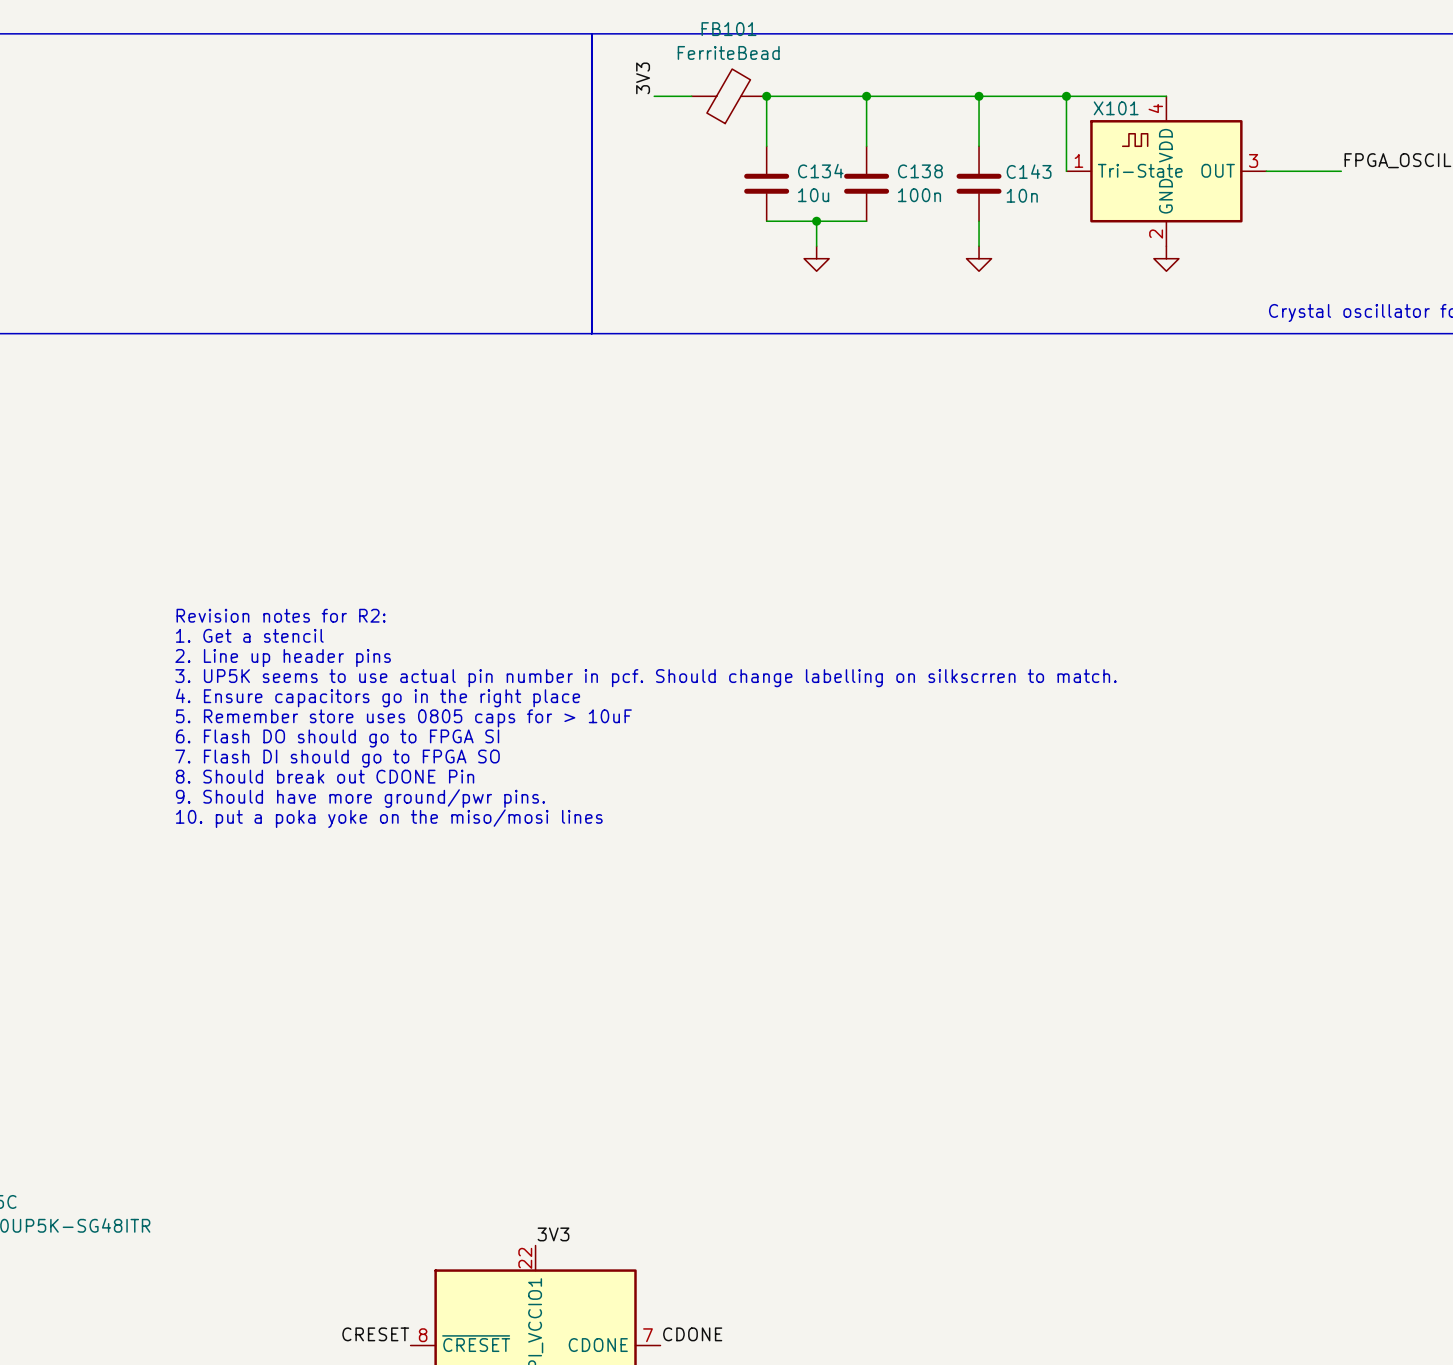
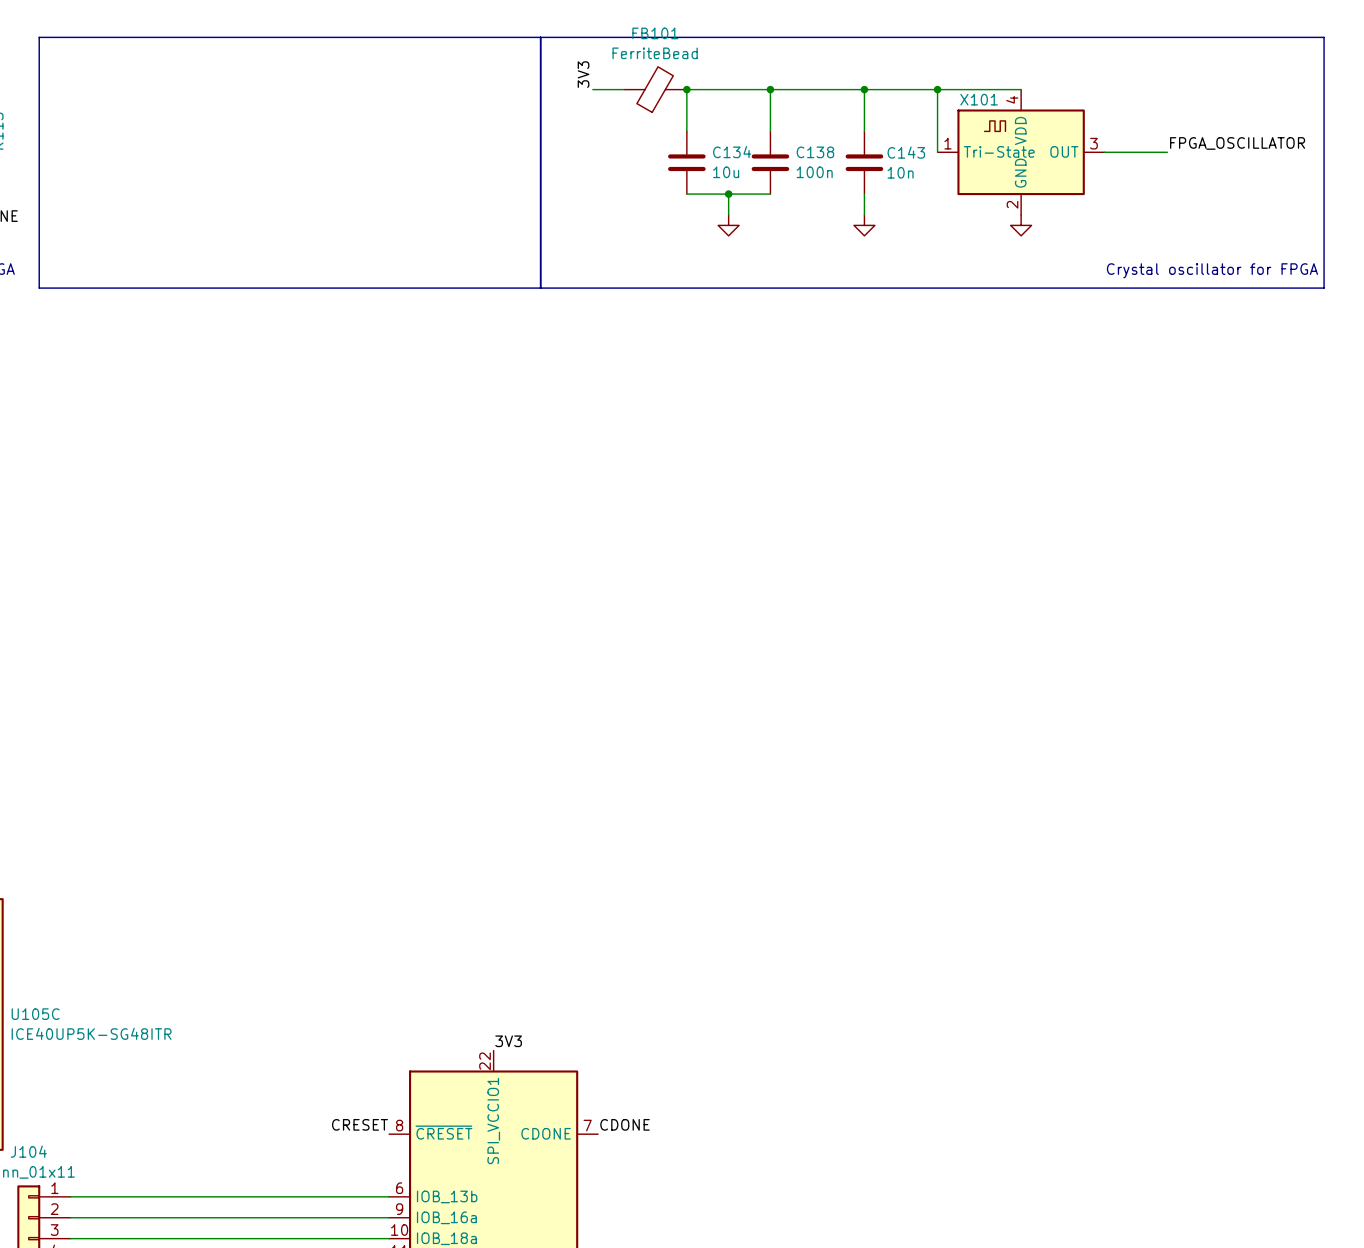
text: Revision notes for R2: (281, 615) -> none
text: 1. Get a stencil (249, 635) -> none
text: 2. Line up header pins (283, 658) -> none
text: 3. UP5K seems to use actual pin number in pcf. Should change labelling on silkscrren to match. (646, 678) -> none
text: 4. Ensure capacitors go in the right place (378, 697) -> none
text: 5. Remember store uses 0805 caps for > 10uF (403, 718) -> none
text: 6. Flash DO should go to FPGA SI (337, 738) -> none
text: 7. Flash DI should go to FPGA SO (337, 758) -> none
text: 8. Should break out CDONE Pin (325, 776) -> none
text: 9. Should have more ground/pwr pins. (360, 798) -> none
text: 10. put a poka yoke on the miso/mosi lines (389, 818) -> none

